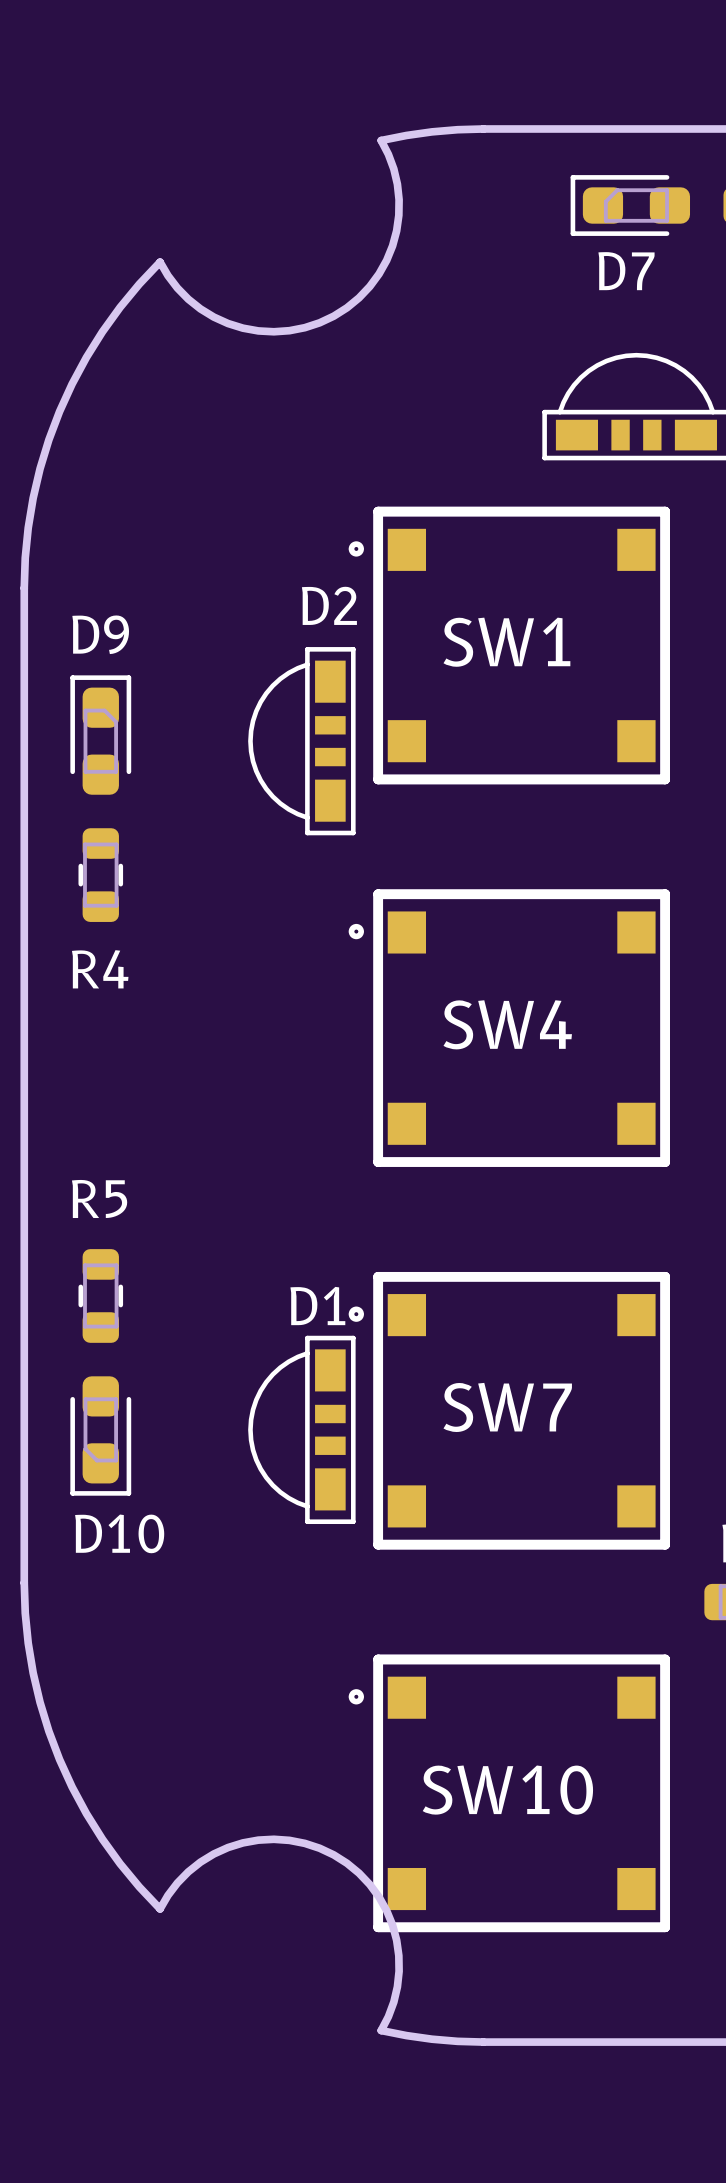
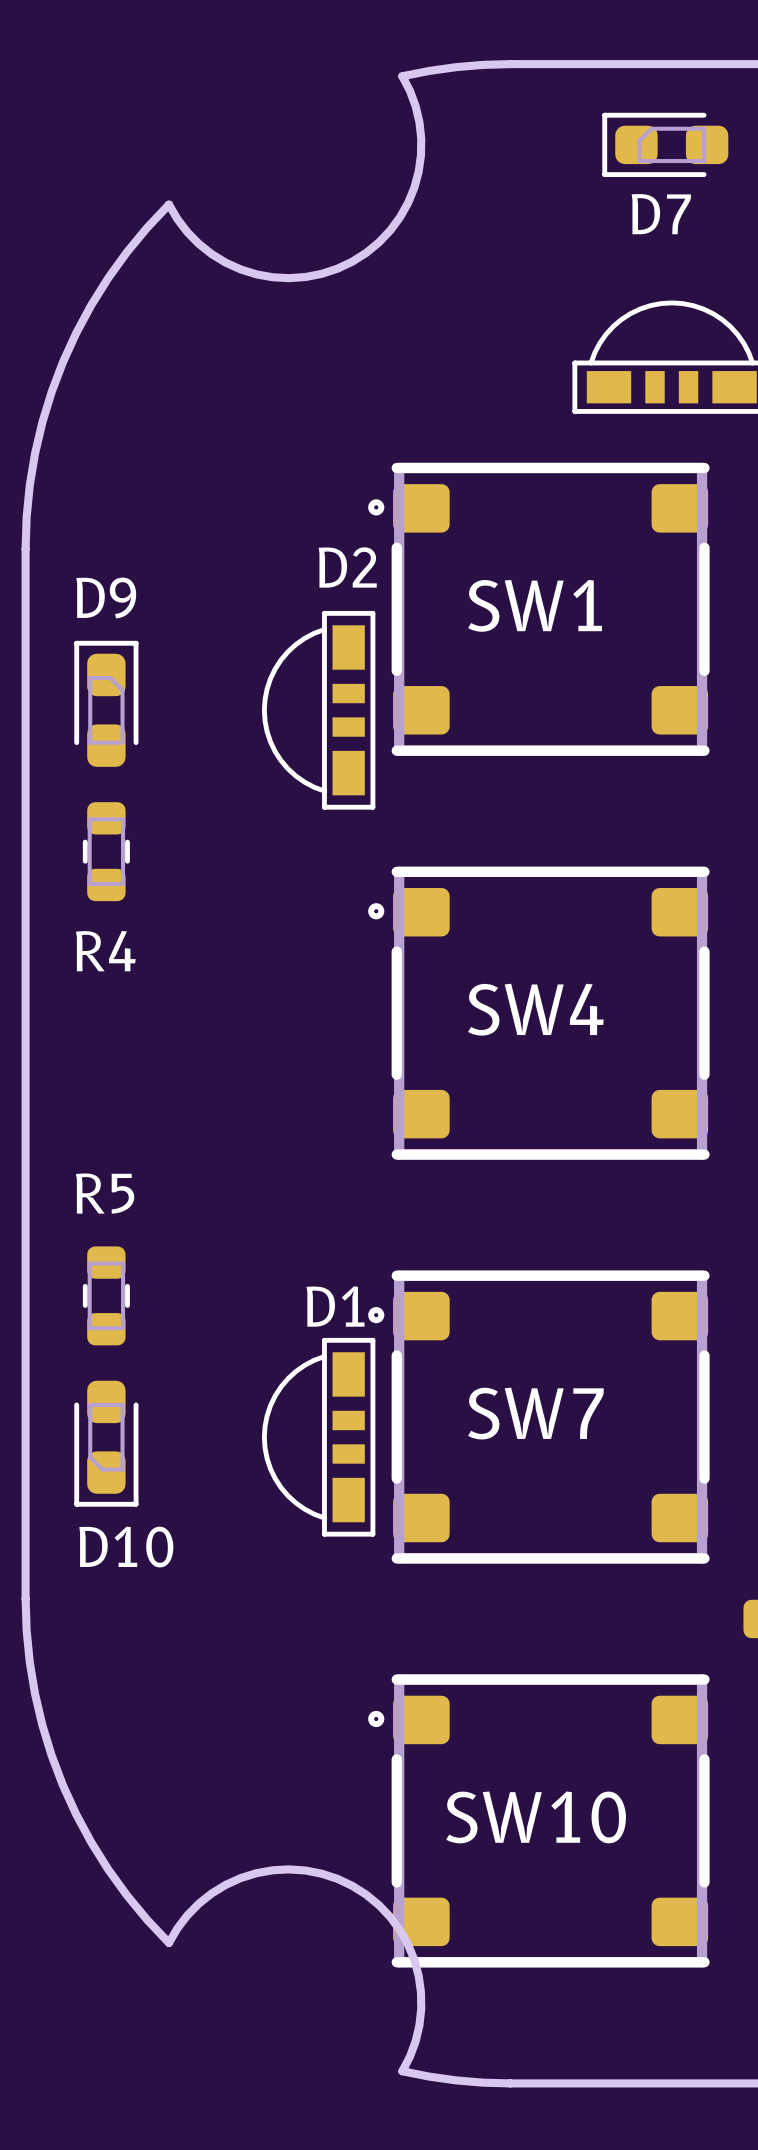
SW1 footprint: [348, 506, 671, 785] -> [368, 462, 710, 756]
SW4 footprint: [348, 889, 671, 1167] -> [368, 866, 710, 1160]
SW7 footprint: [348, 1271, 671, 1550] -> [368, 1270, 710, 1564]
SW10 footprint: [348, 1654, 671, 1933] -> [368, 1674, 710, 1968]

